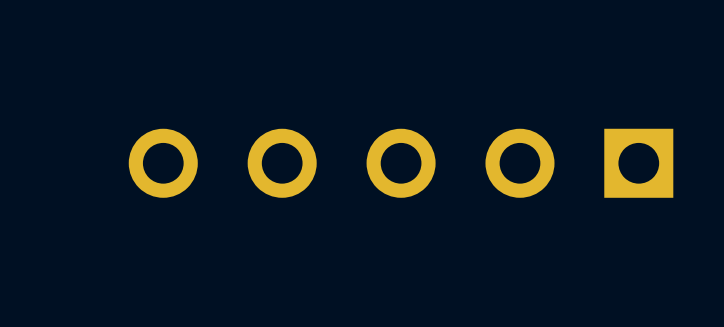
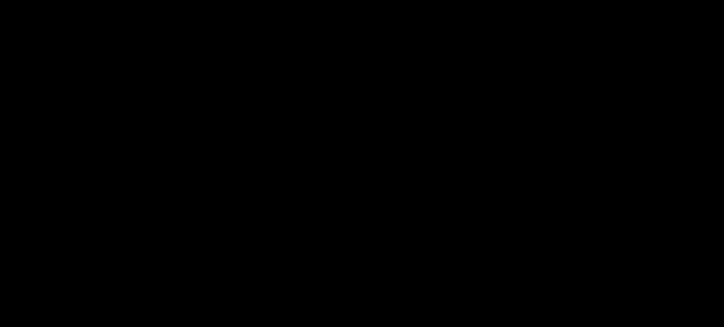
part: (401, 163) -> none

